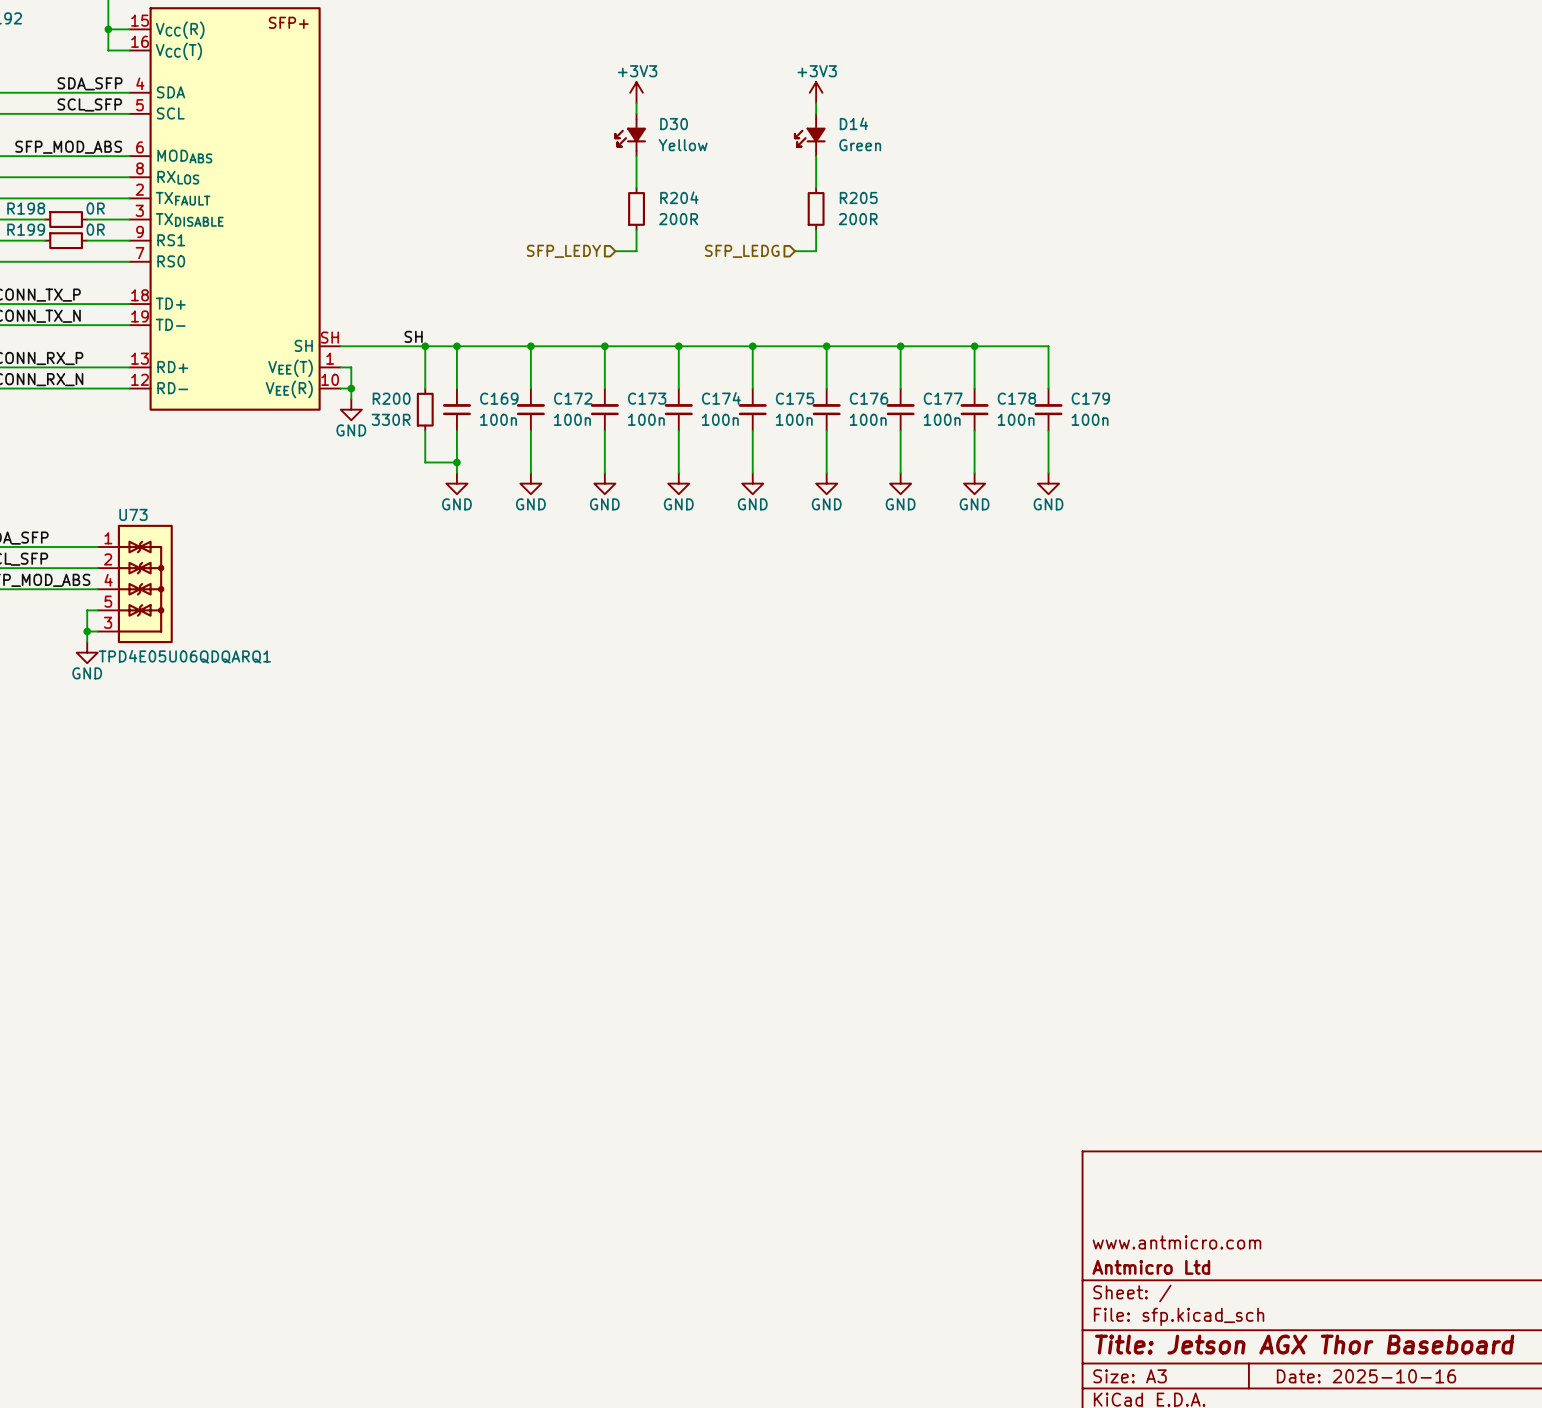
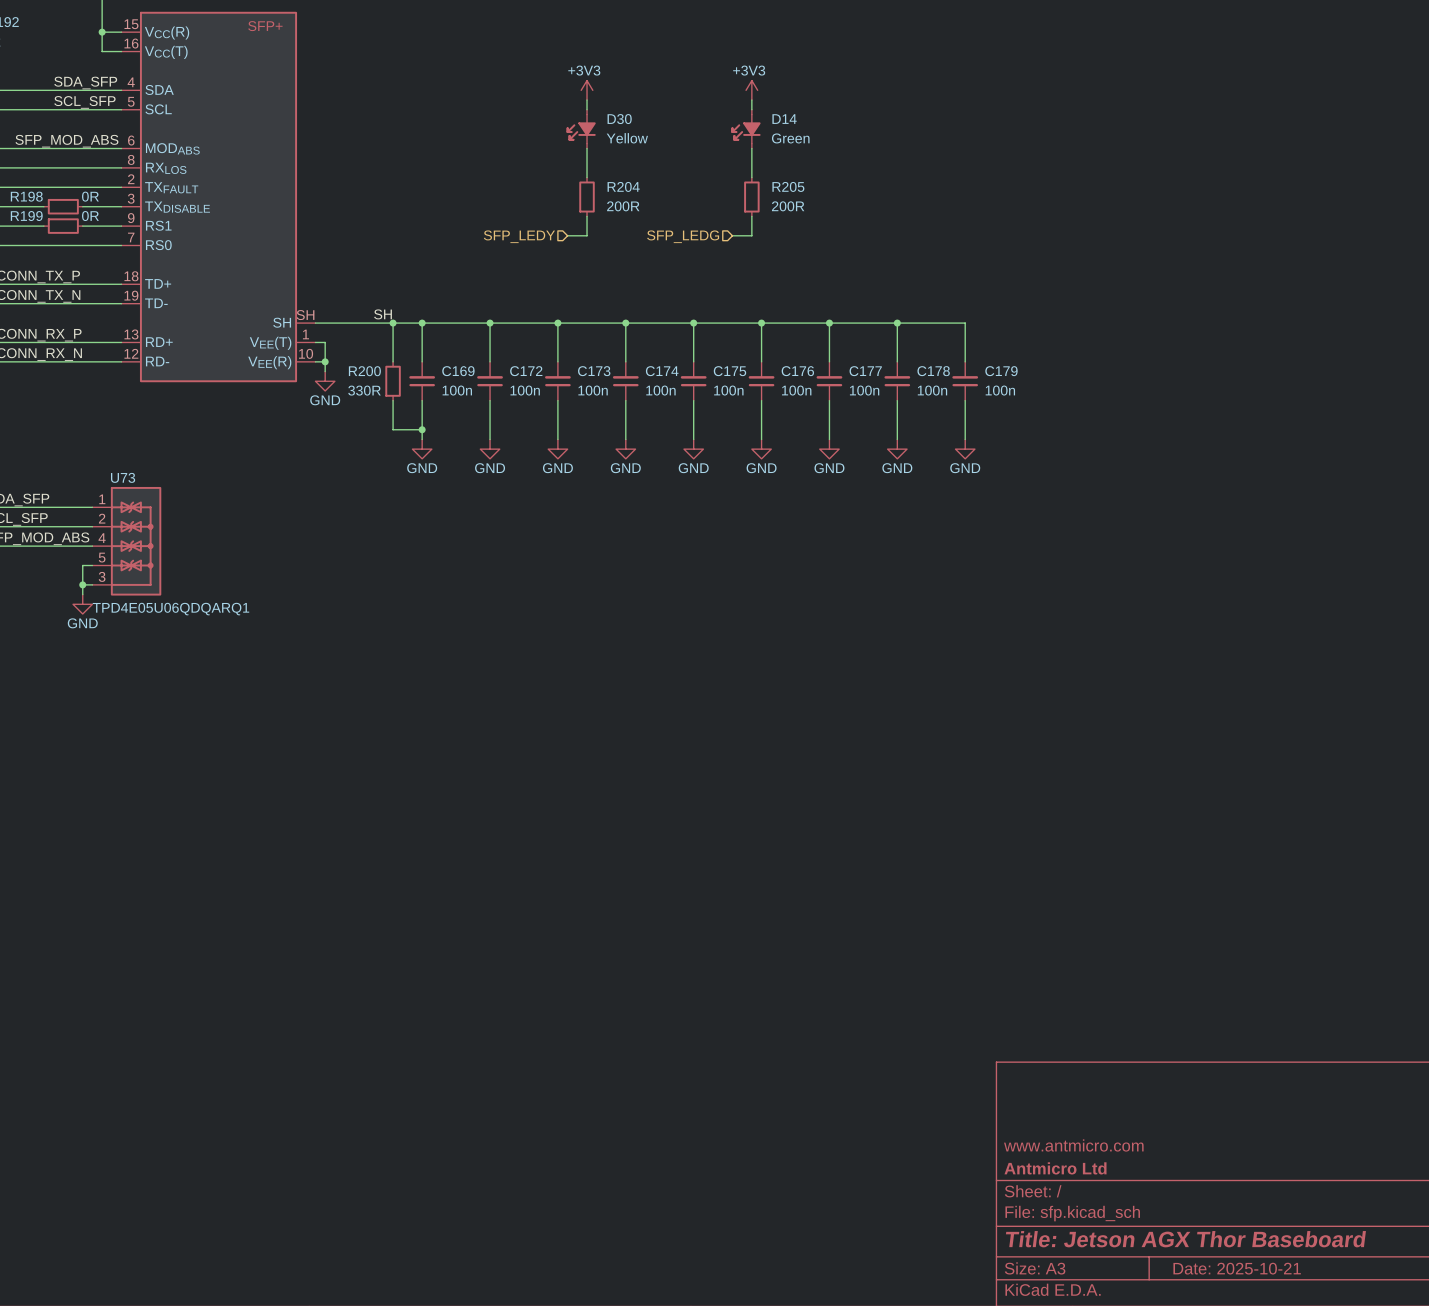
title block: Date: 2025-10-16 (1366, 1376) -> Date: 2025-10-21 (1237, 1268)

